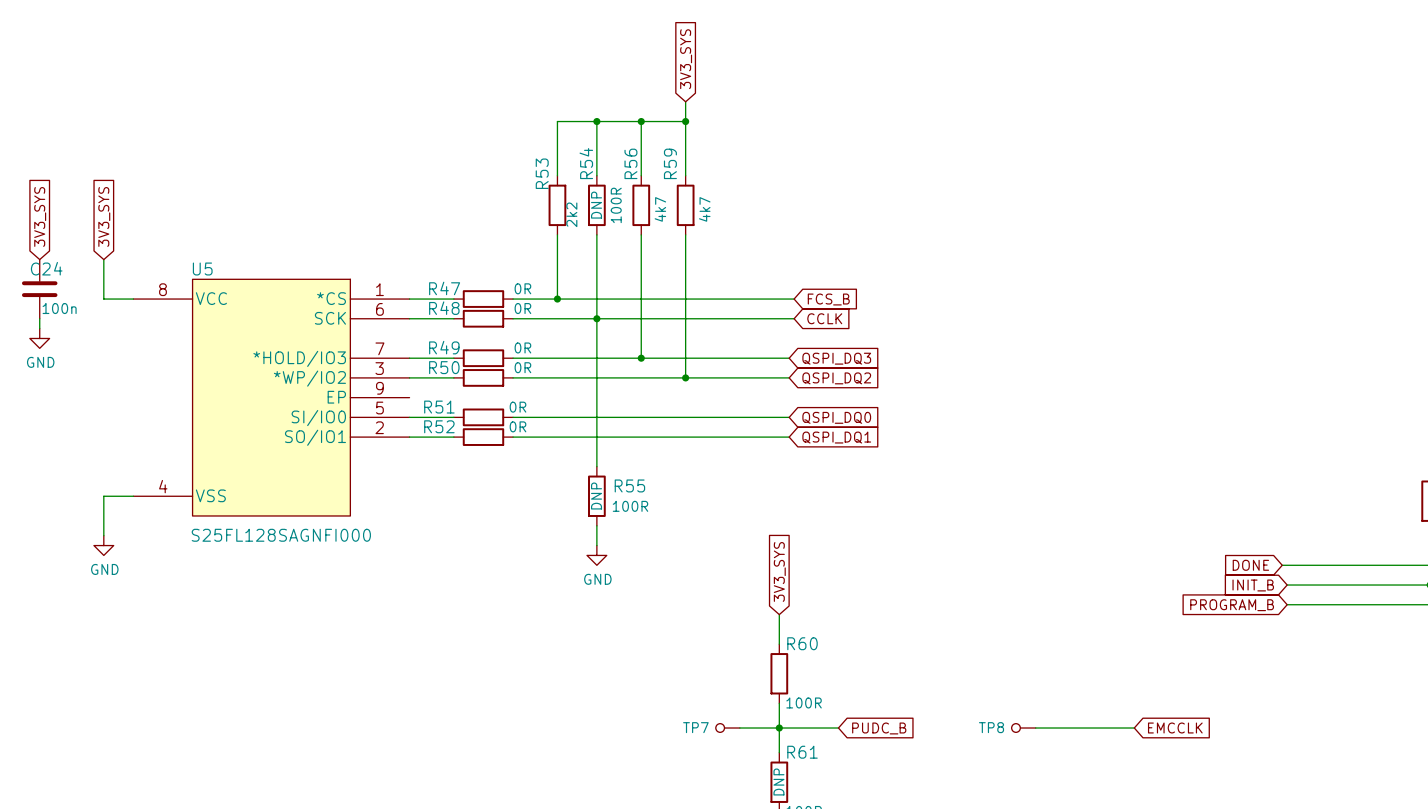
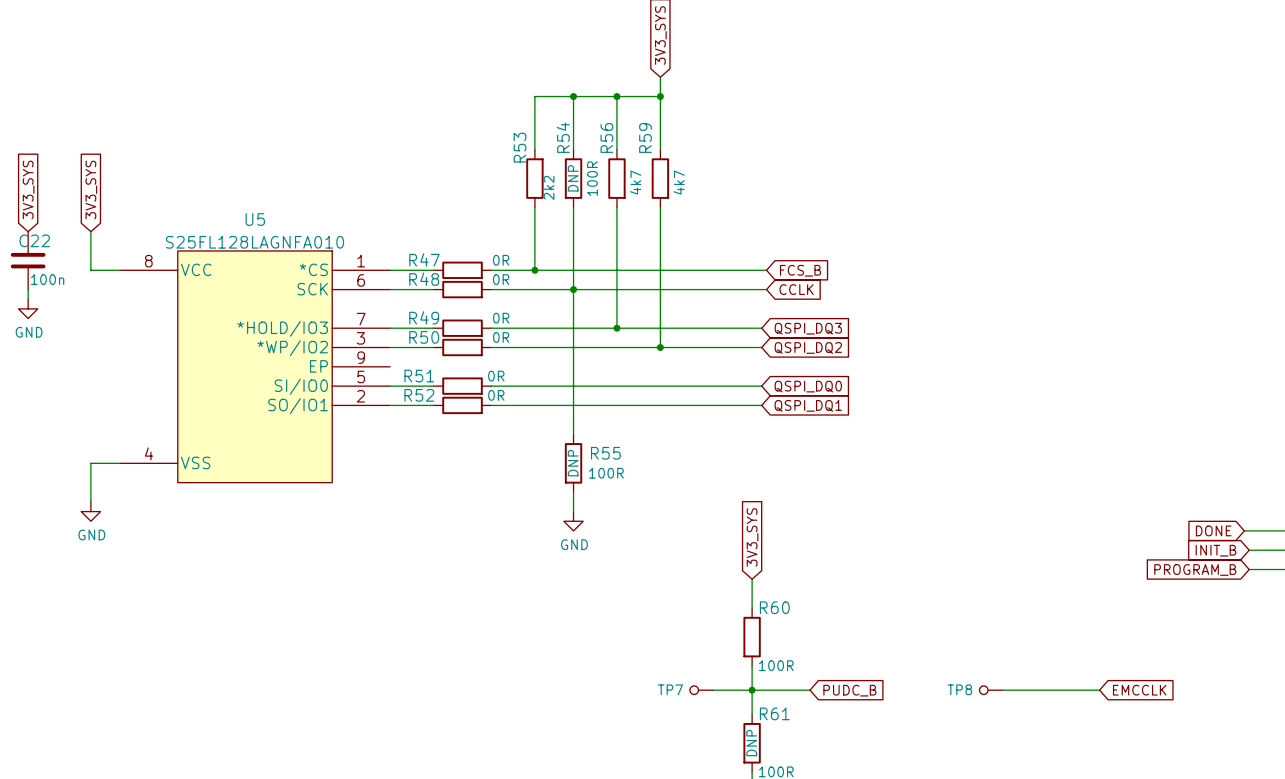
C24 name: C24 (46, 268) -> C22 (34, 240)
U5 name position: U5 (202, 269) -> U5 (255, 219)
U5 value: S25FL128SAGNFI000 (281, 535) -> S25FL128LAGNFA010 (254, 242)

